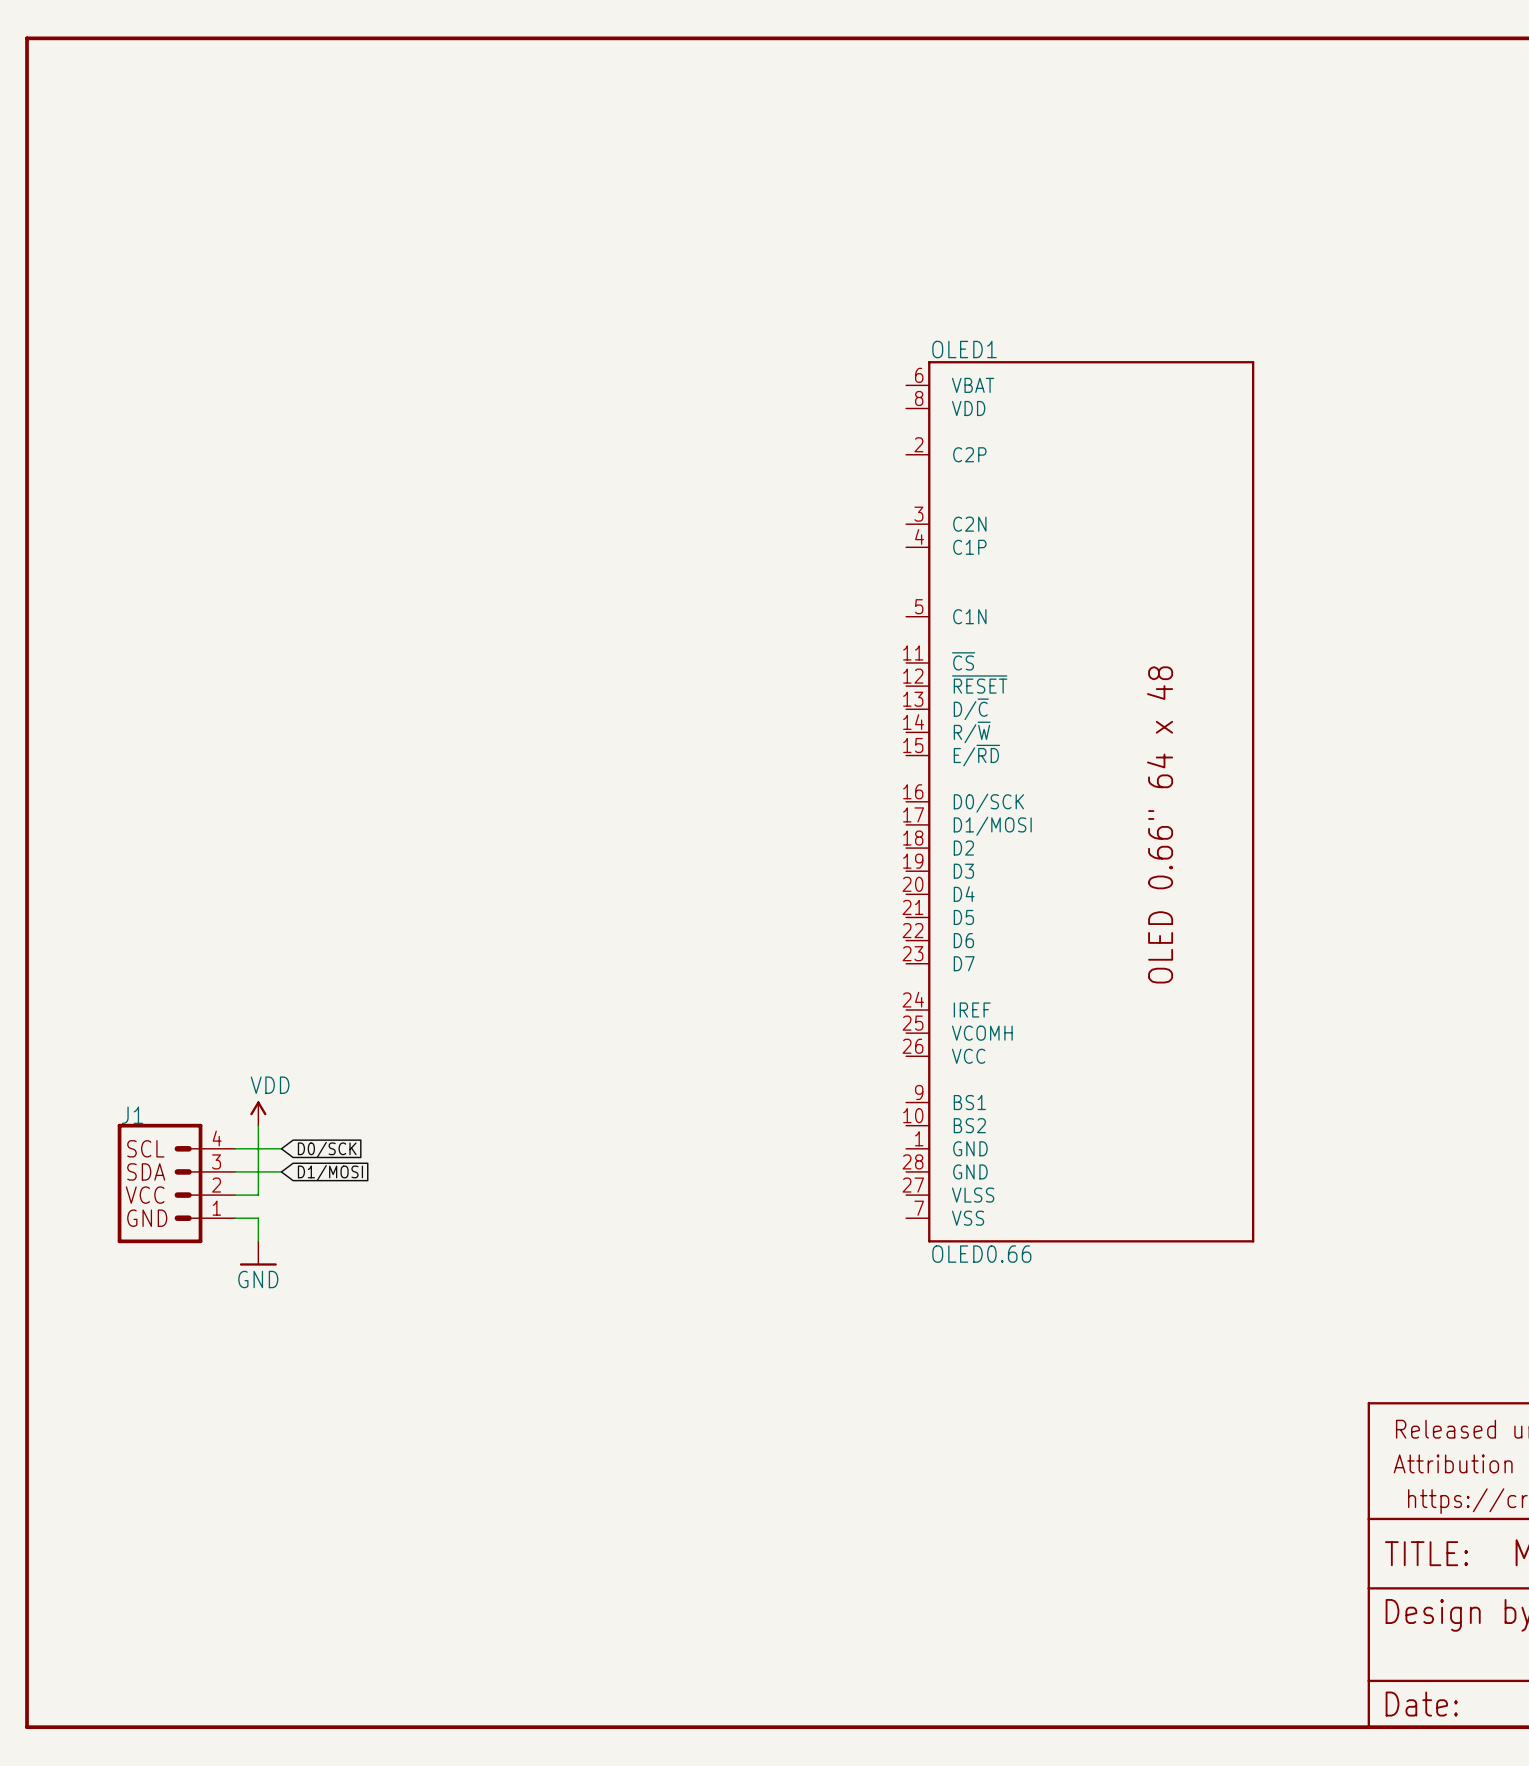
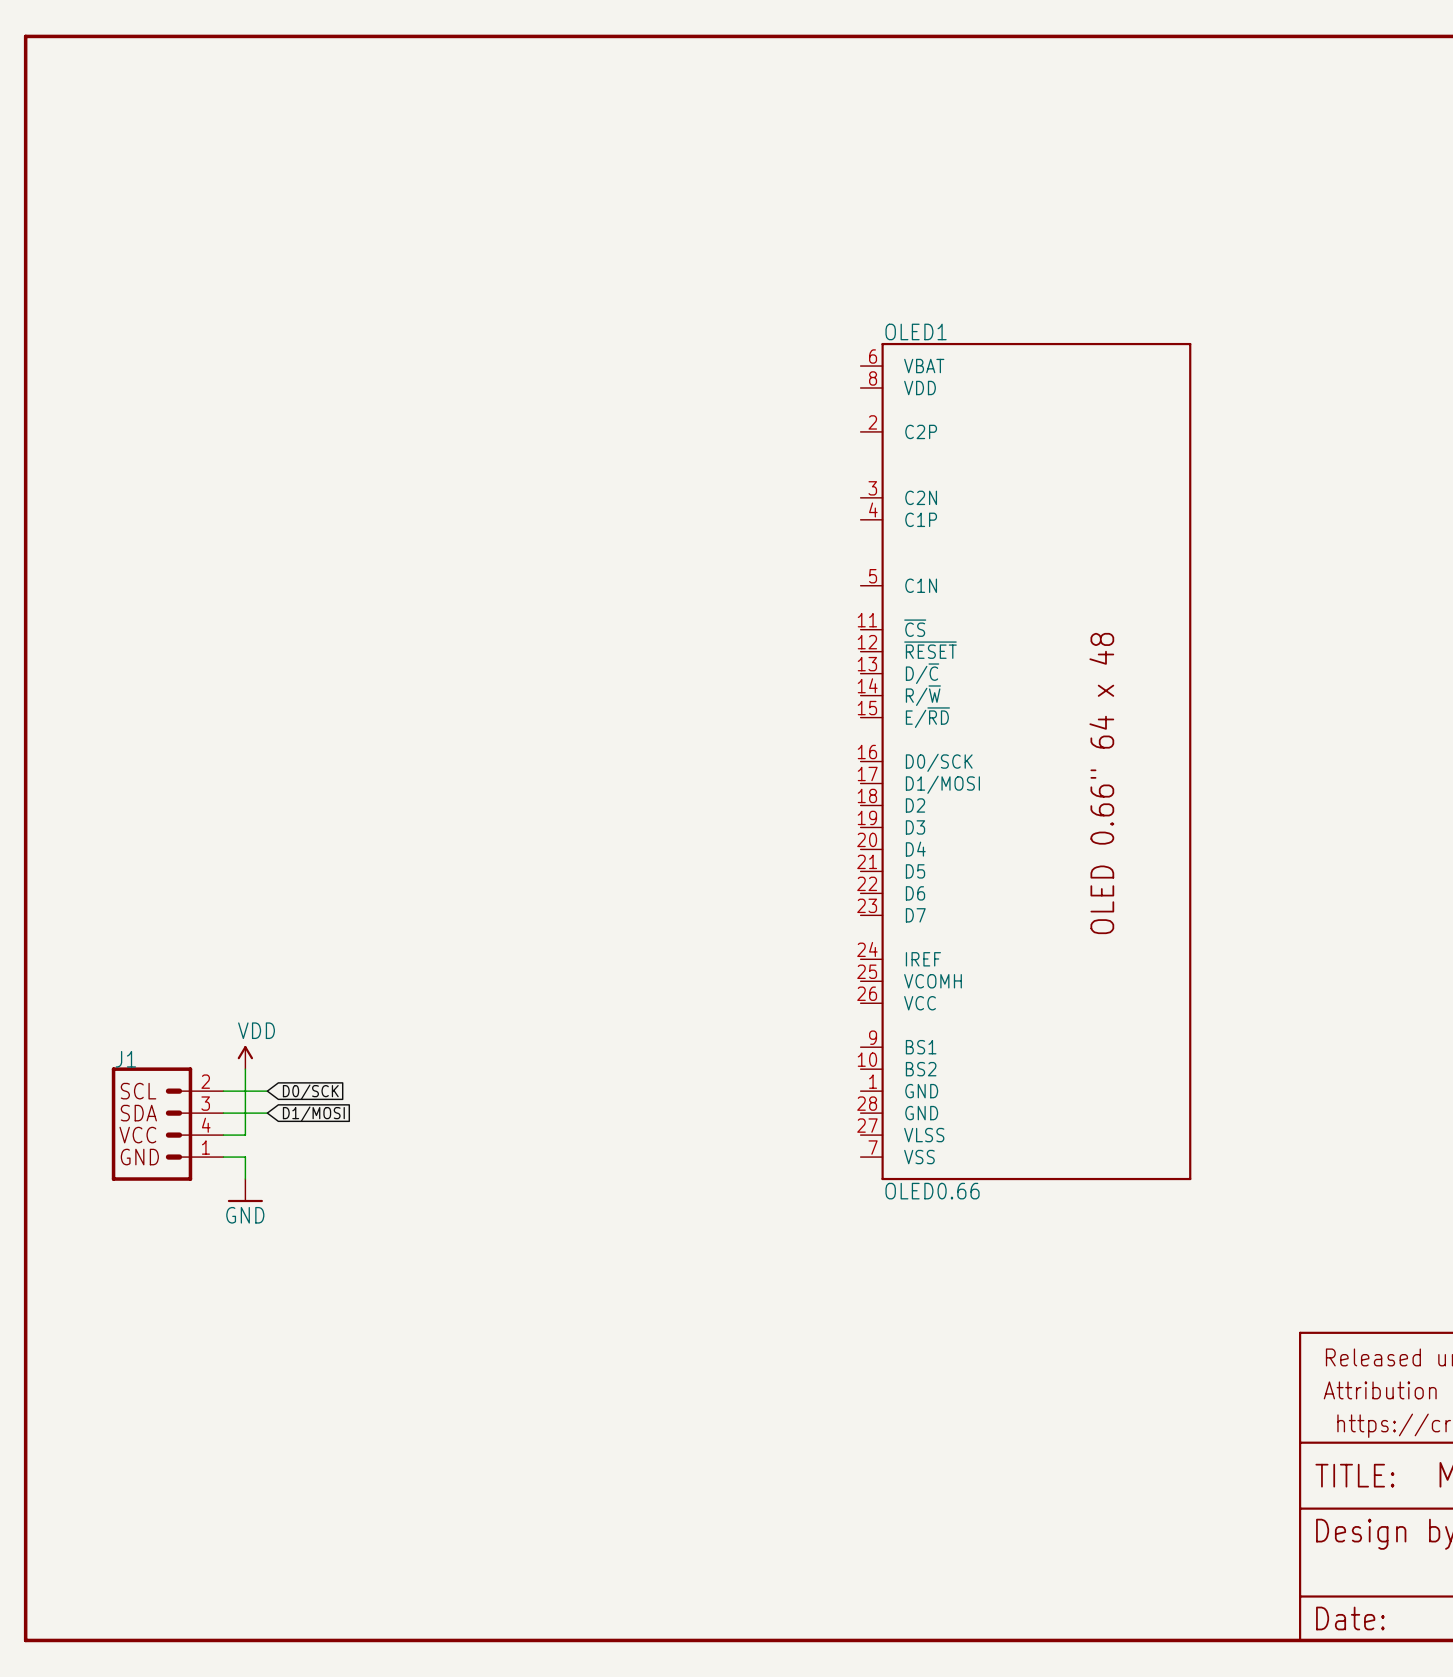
J1 pin number: 4 (217, 1138) -> 2 (205, 1081)
J1 pin number: 2 (216, 1185) -> 4 (206, 1125)

